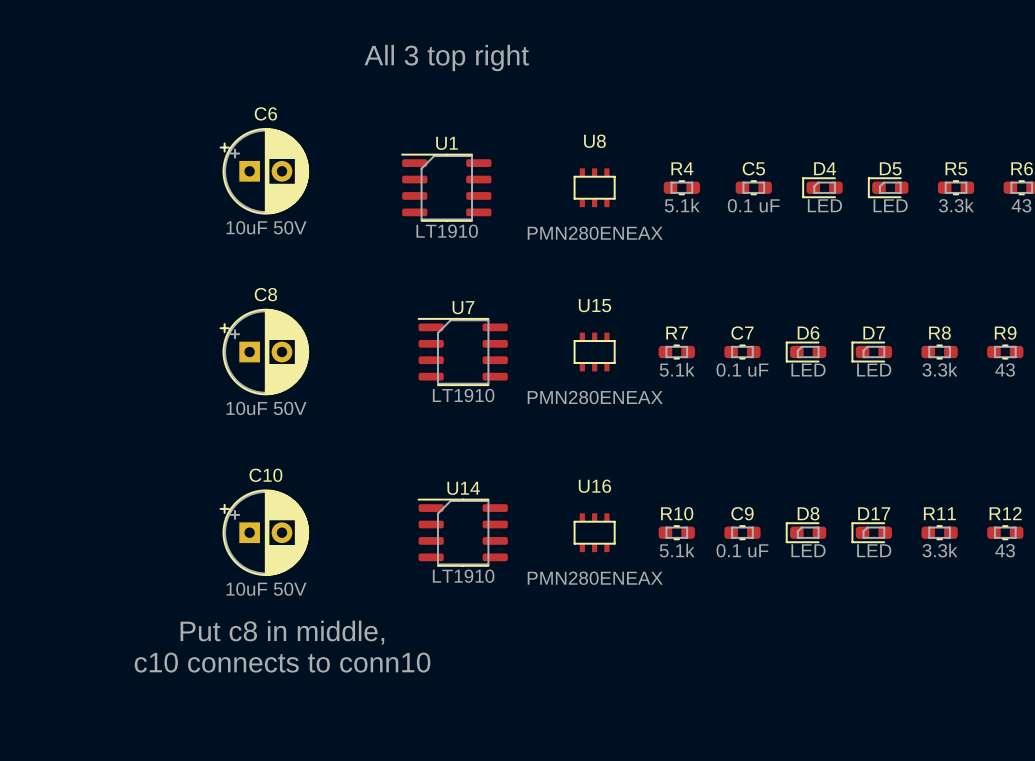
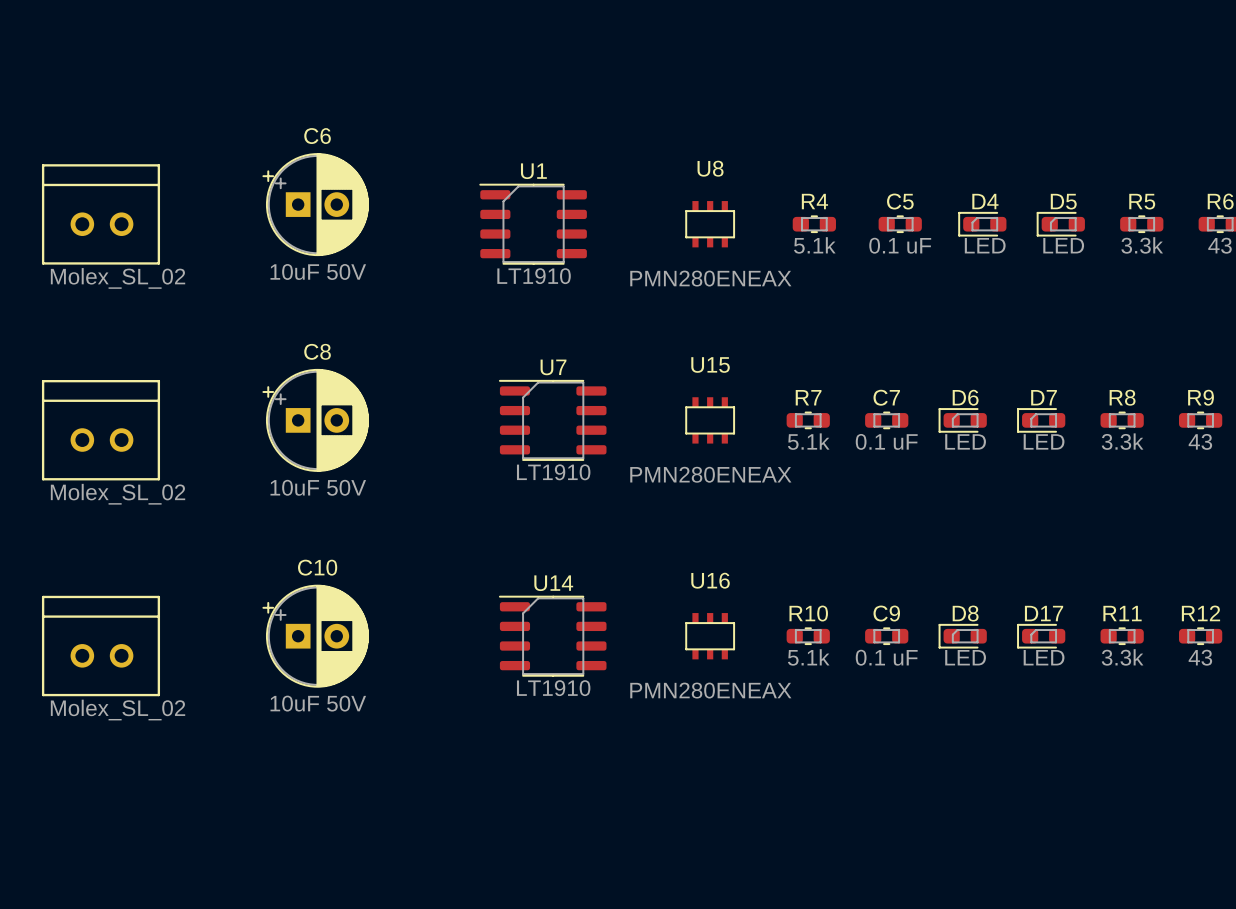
text: All 3 top right (446, 58) -> none
part: none -> Molex_SL_02 (100, 214)
part: none -> Molex_SL_02 (100, 430)
part: none -> Molex_SL_02 (100, 646)
text: Put c8 in middle, (282, 632) -> none
text: c10 connects to conn10 (282, 662) -> none

